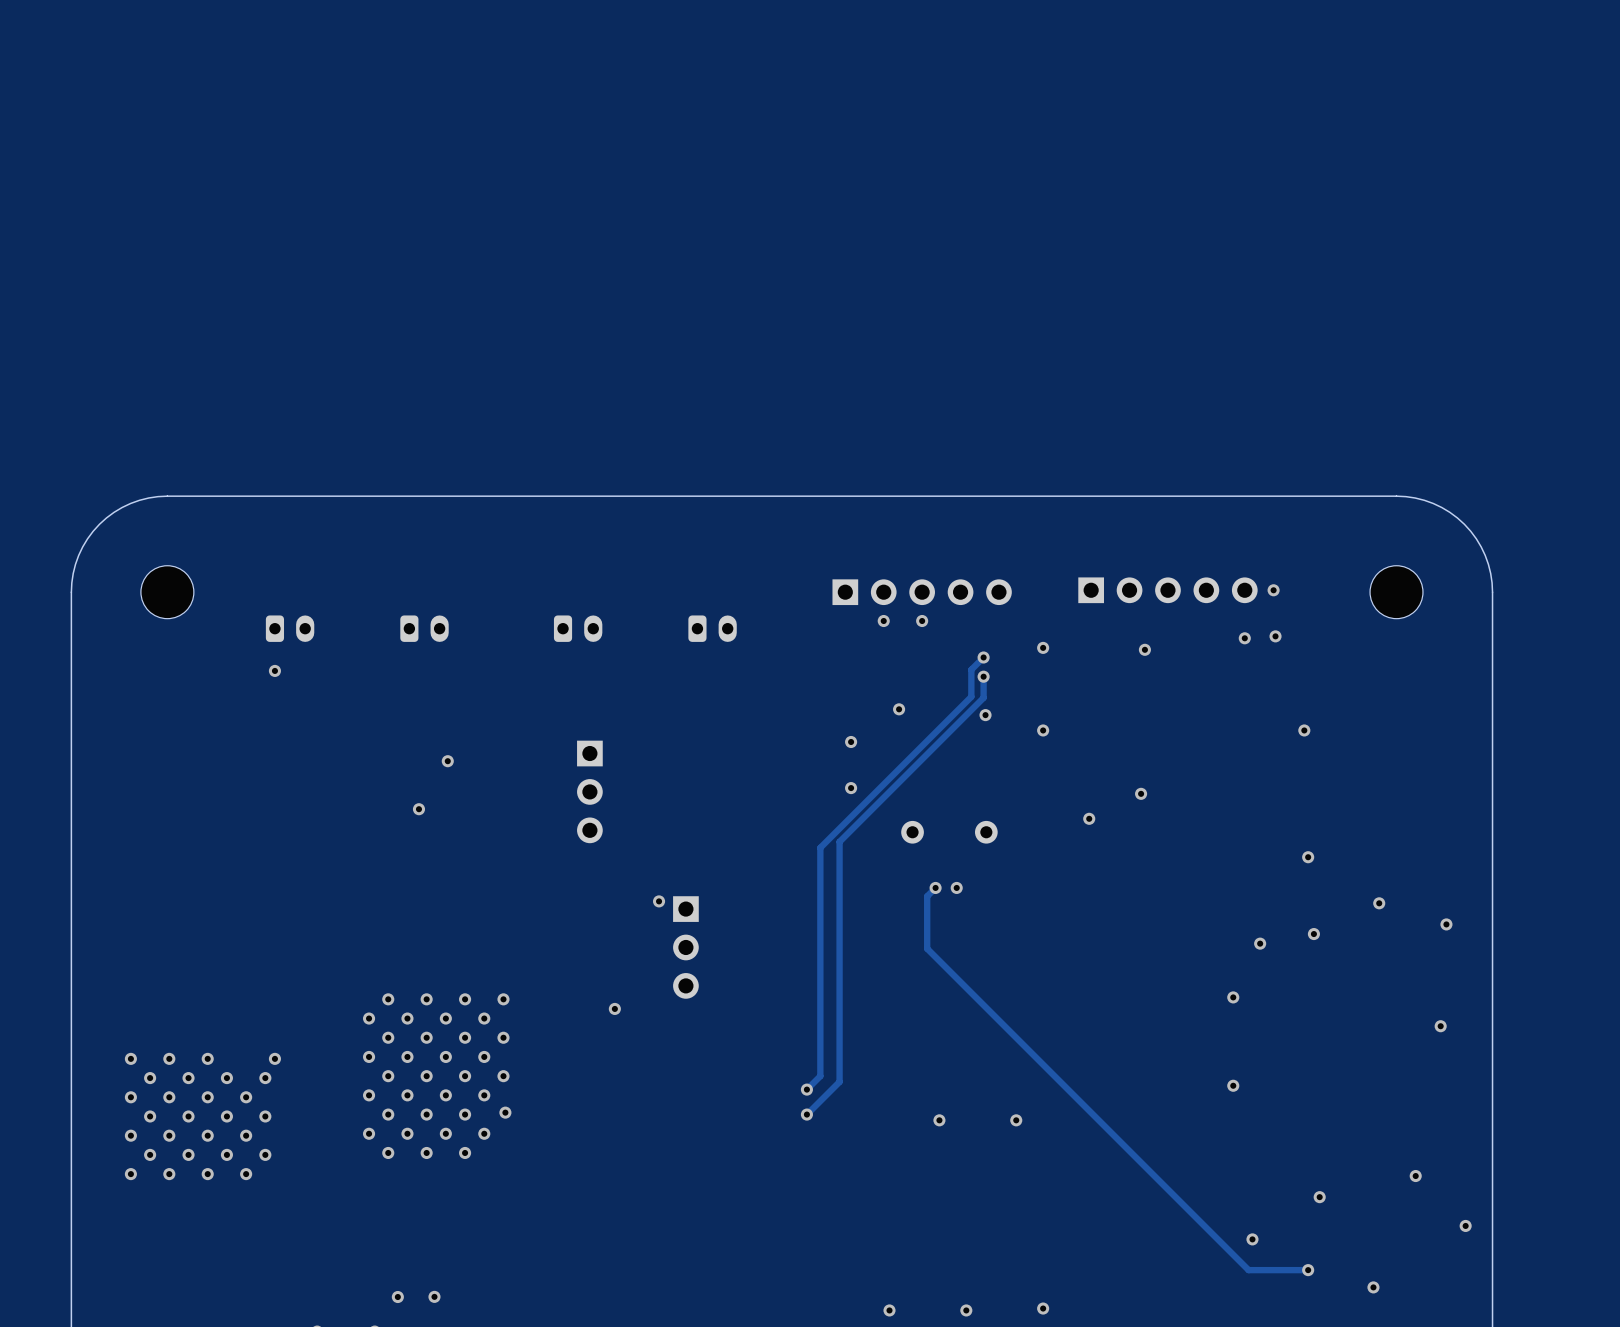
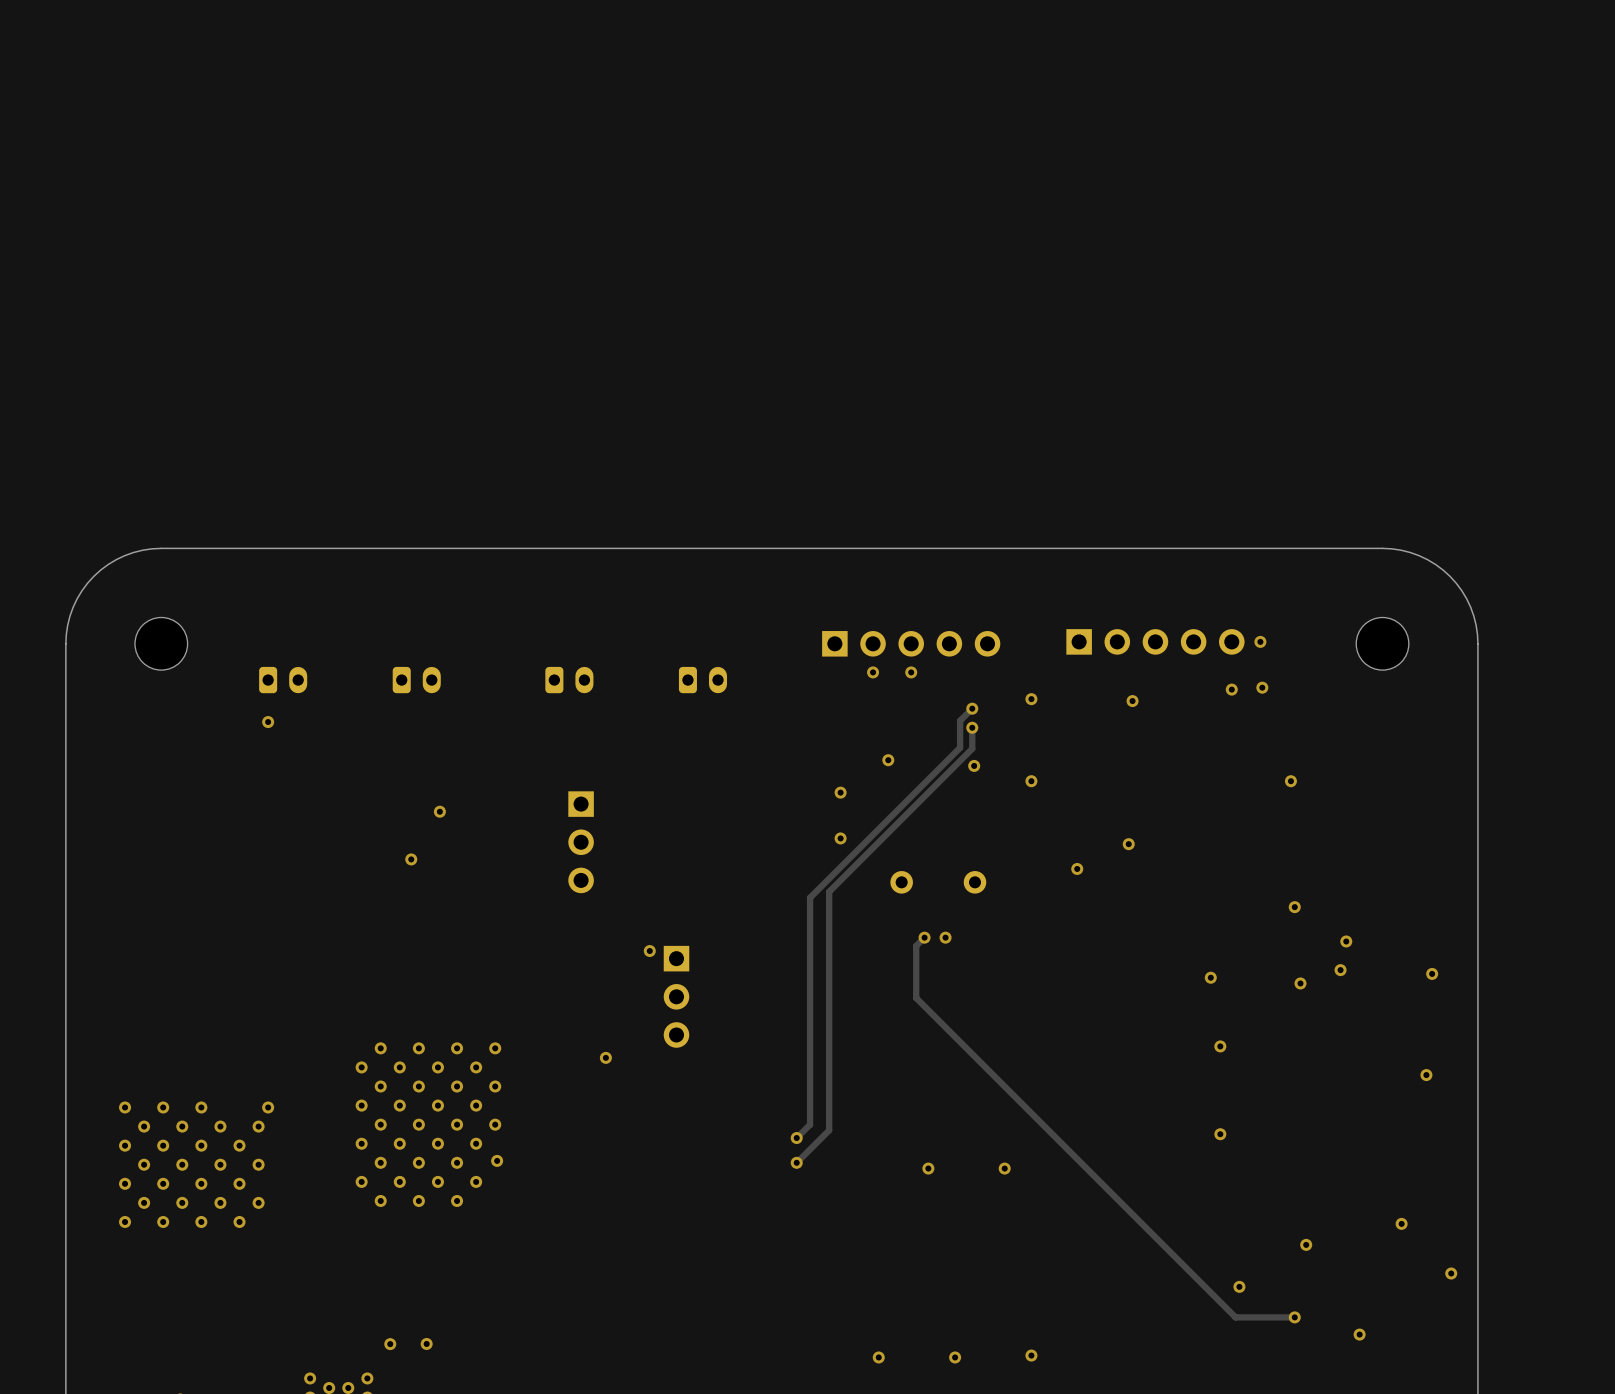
via: none -> (1346, 941)
via: (1379, 903) -> none
via: none -> (1340, 970)
via position: (1260, 943) -> (1210, 977)

